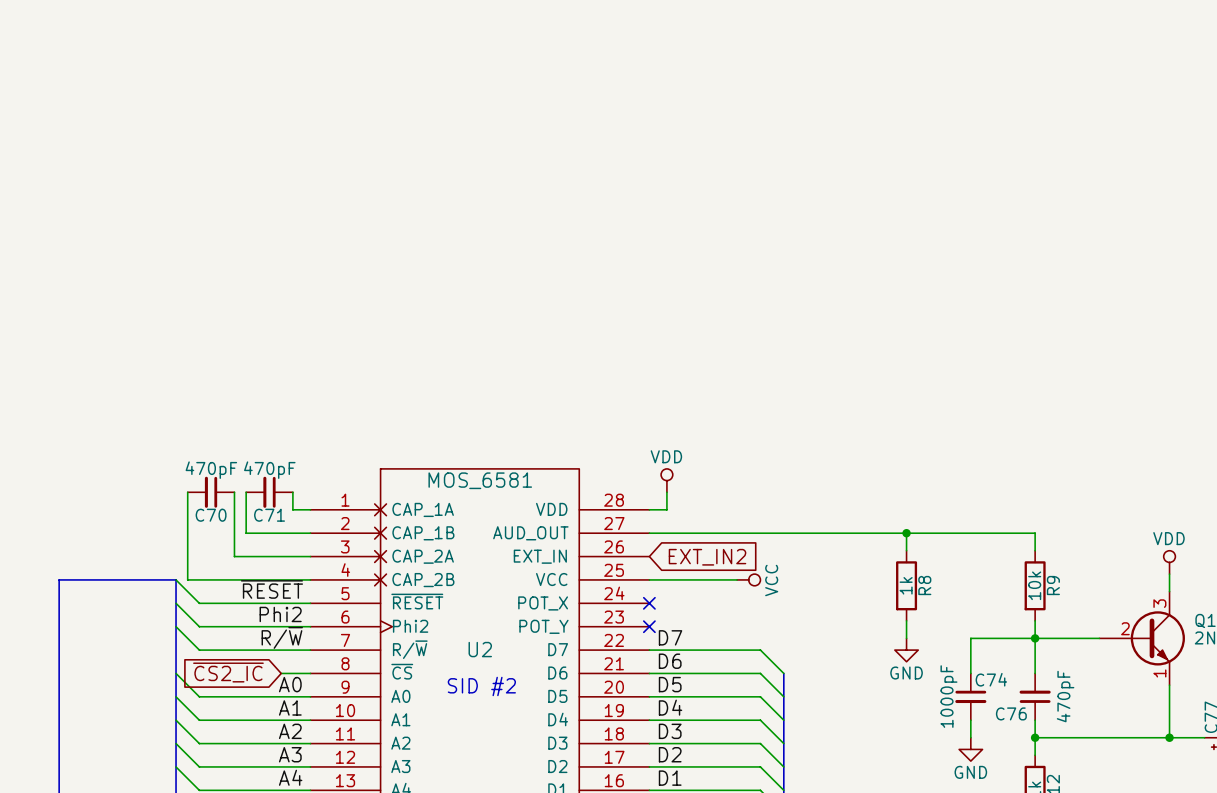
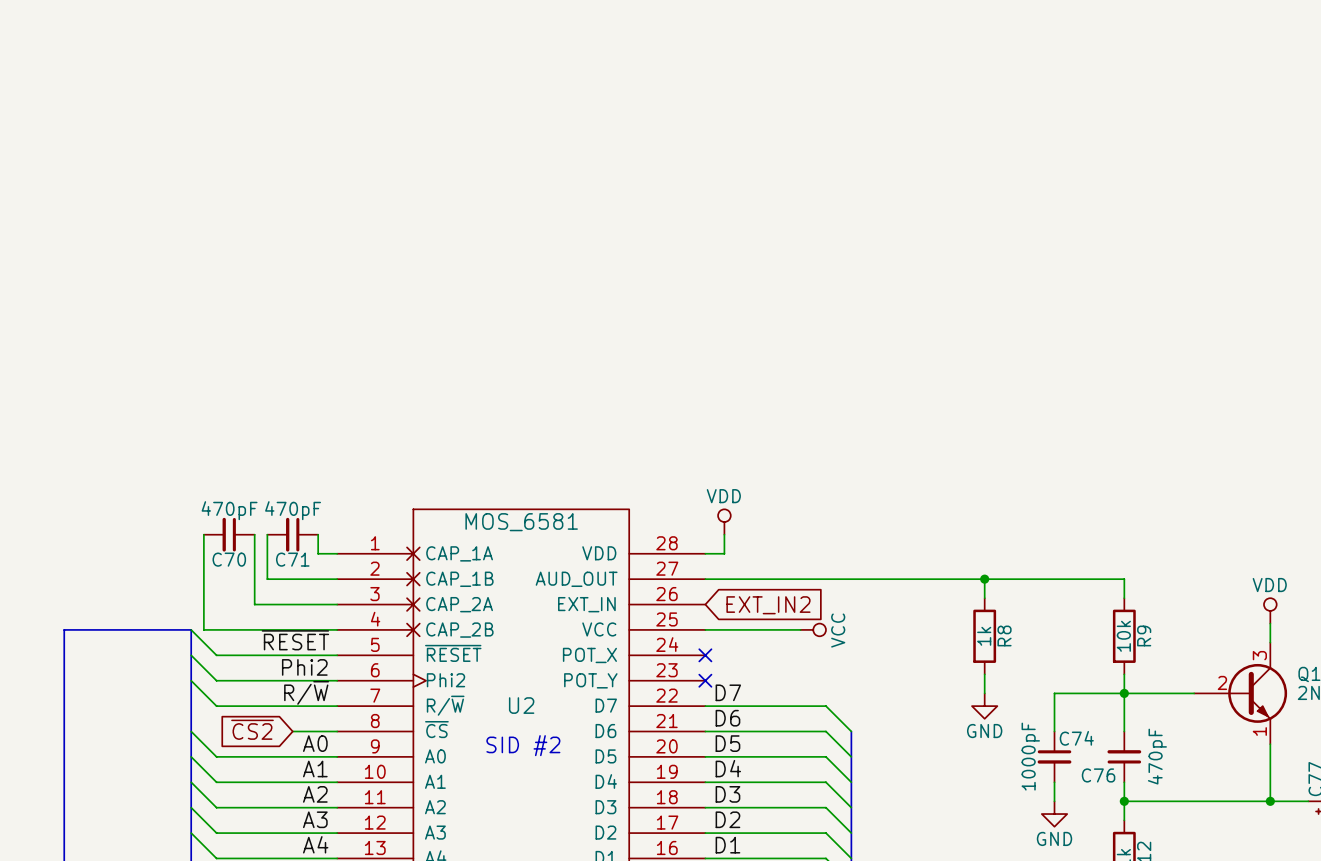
global label: ~{CS2_IC} (228, 672) -> ~{CS2} (252, 729)
wire: none -> (292, 731) (305, 731)

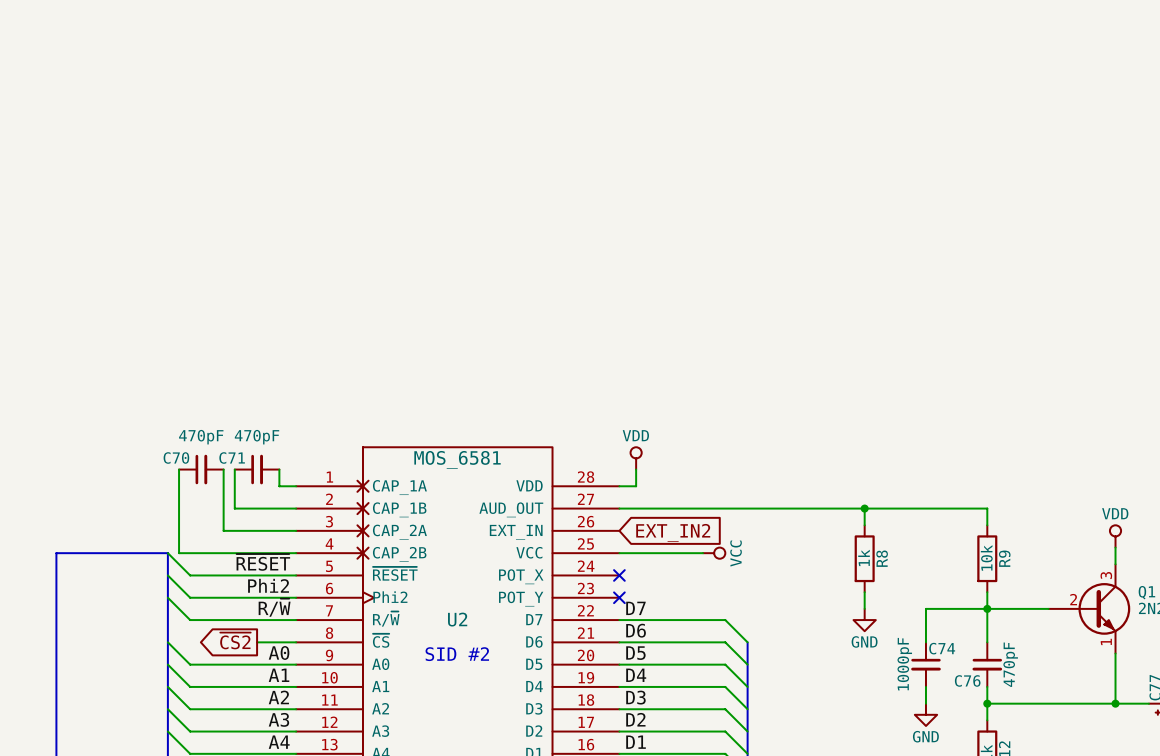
C70 rotation: 0° (229, 534) -> 180° (201, 469)
C71 rotation: 0° (292, 534) -> 180° (257, 469)
C70 name position: C70 (229, 559) -> C70 (176, 457)
C71 name position: C71 (292, 559) -> C71 (232, 457)
global label shape: input (252, 729) -> output (235, 640)
C76 rotation: 0° (1124, 756) -> 180° (987, 664)

